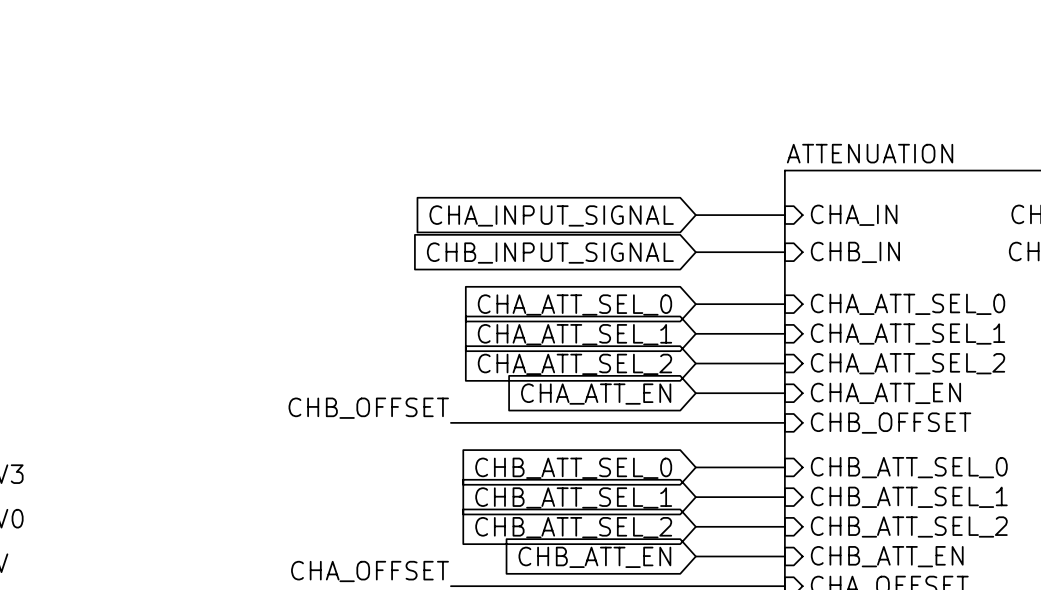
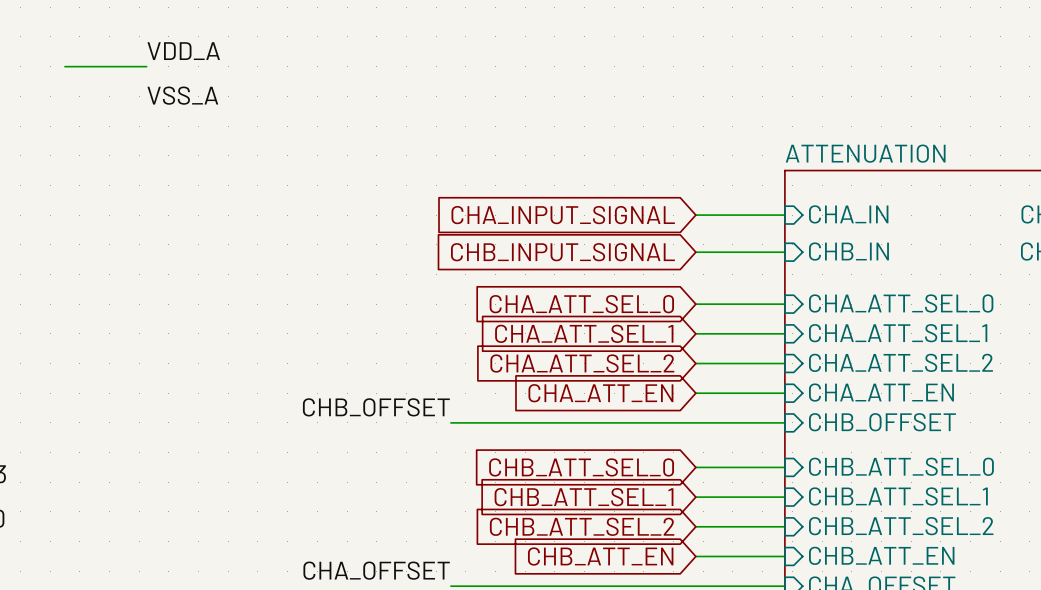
label: none -> VDD_A (183, 51)
wire: none -> (64, 66) (146, 66)
label: none -> VSS_A (182, 95)

